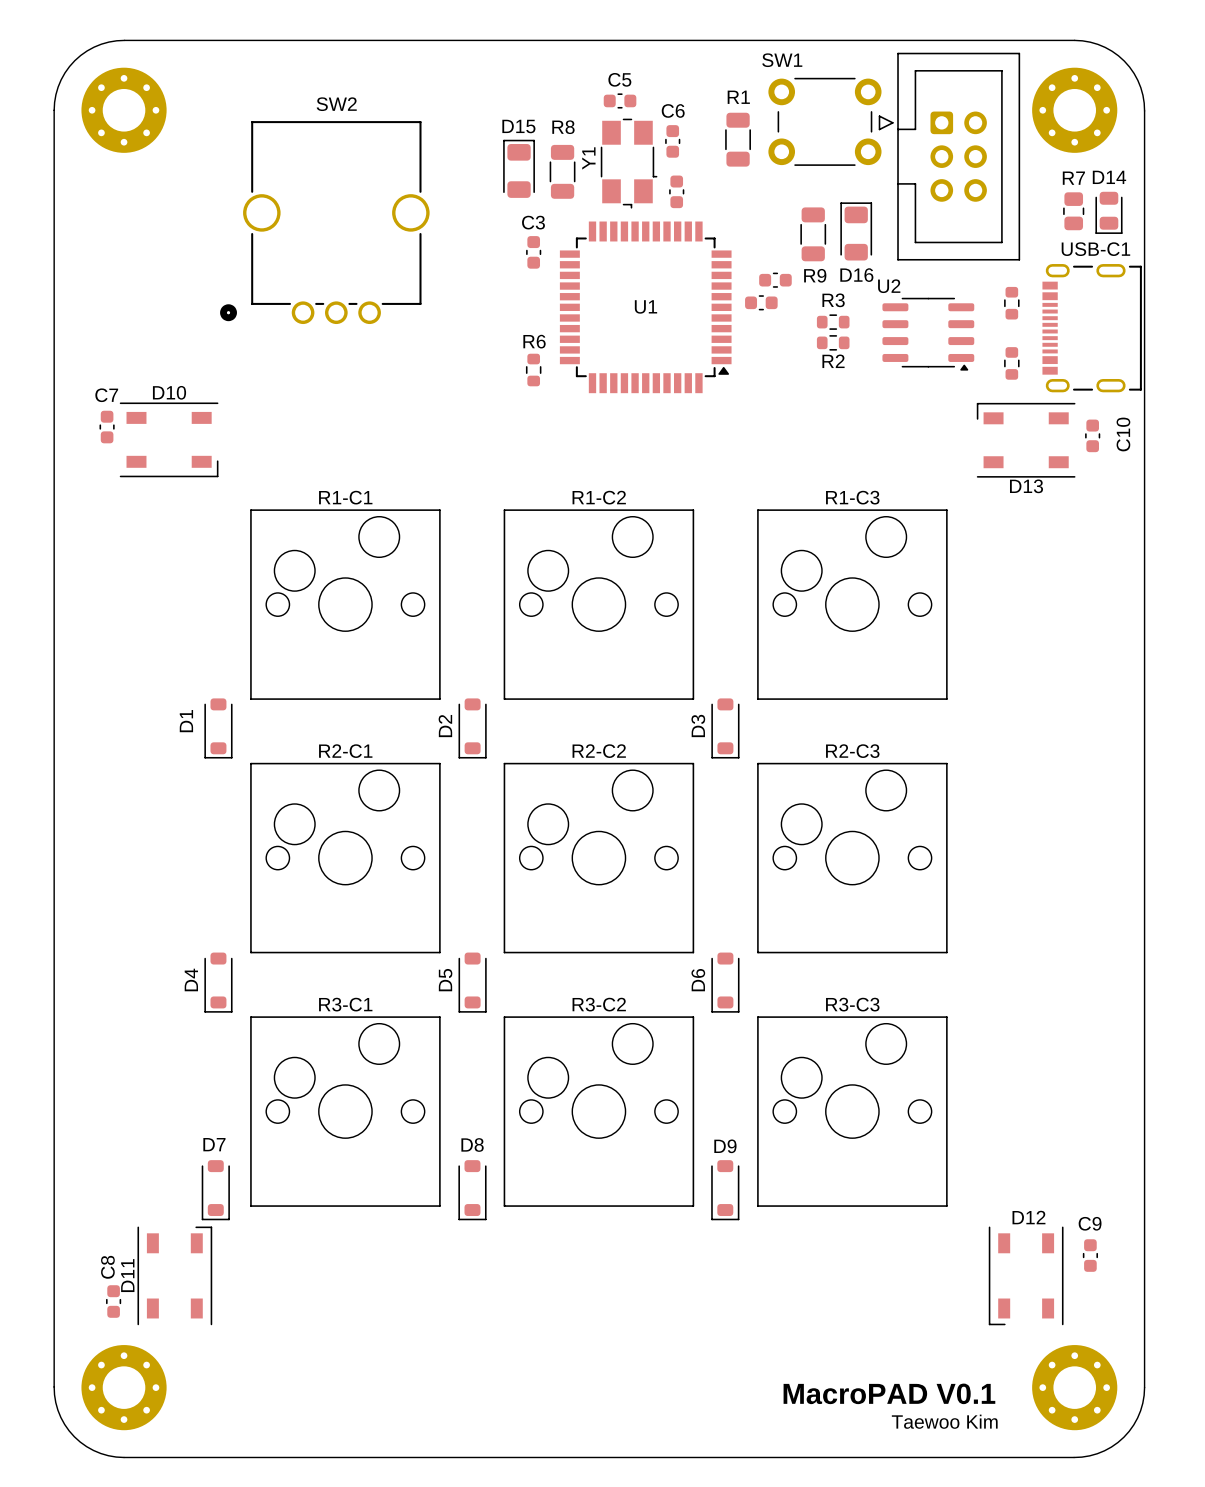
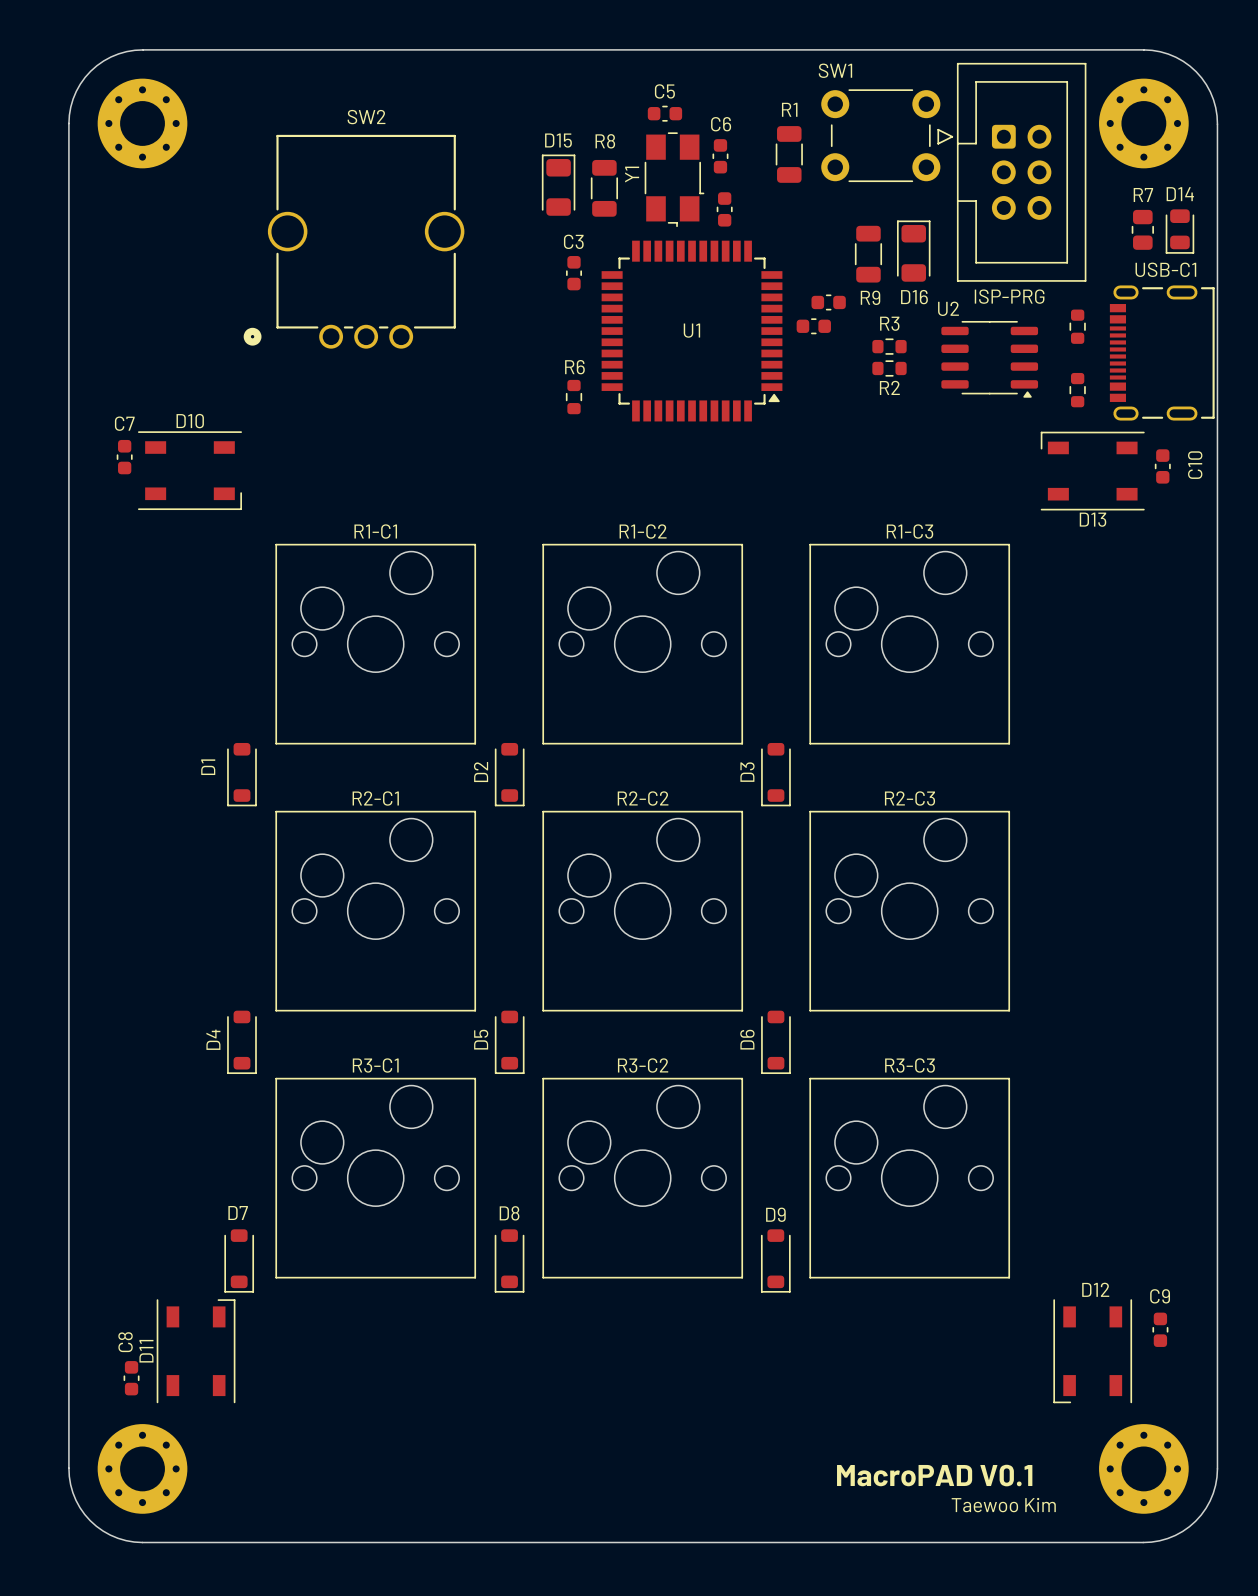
text: none -> ISP-PRG (1009, 296)

